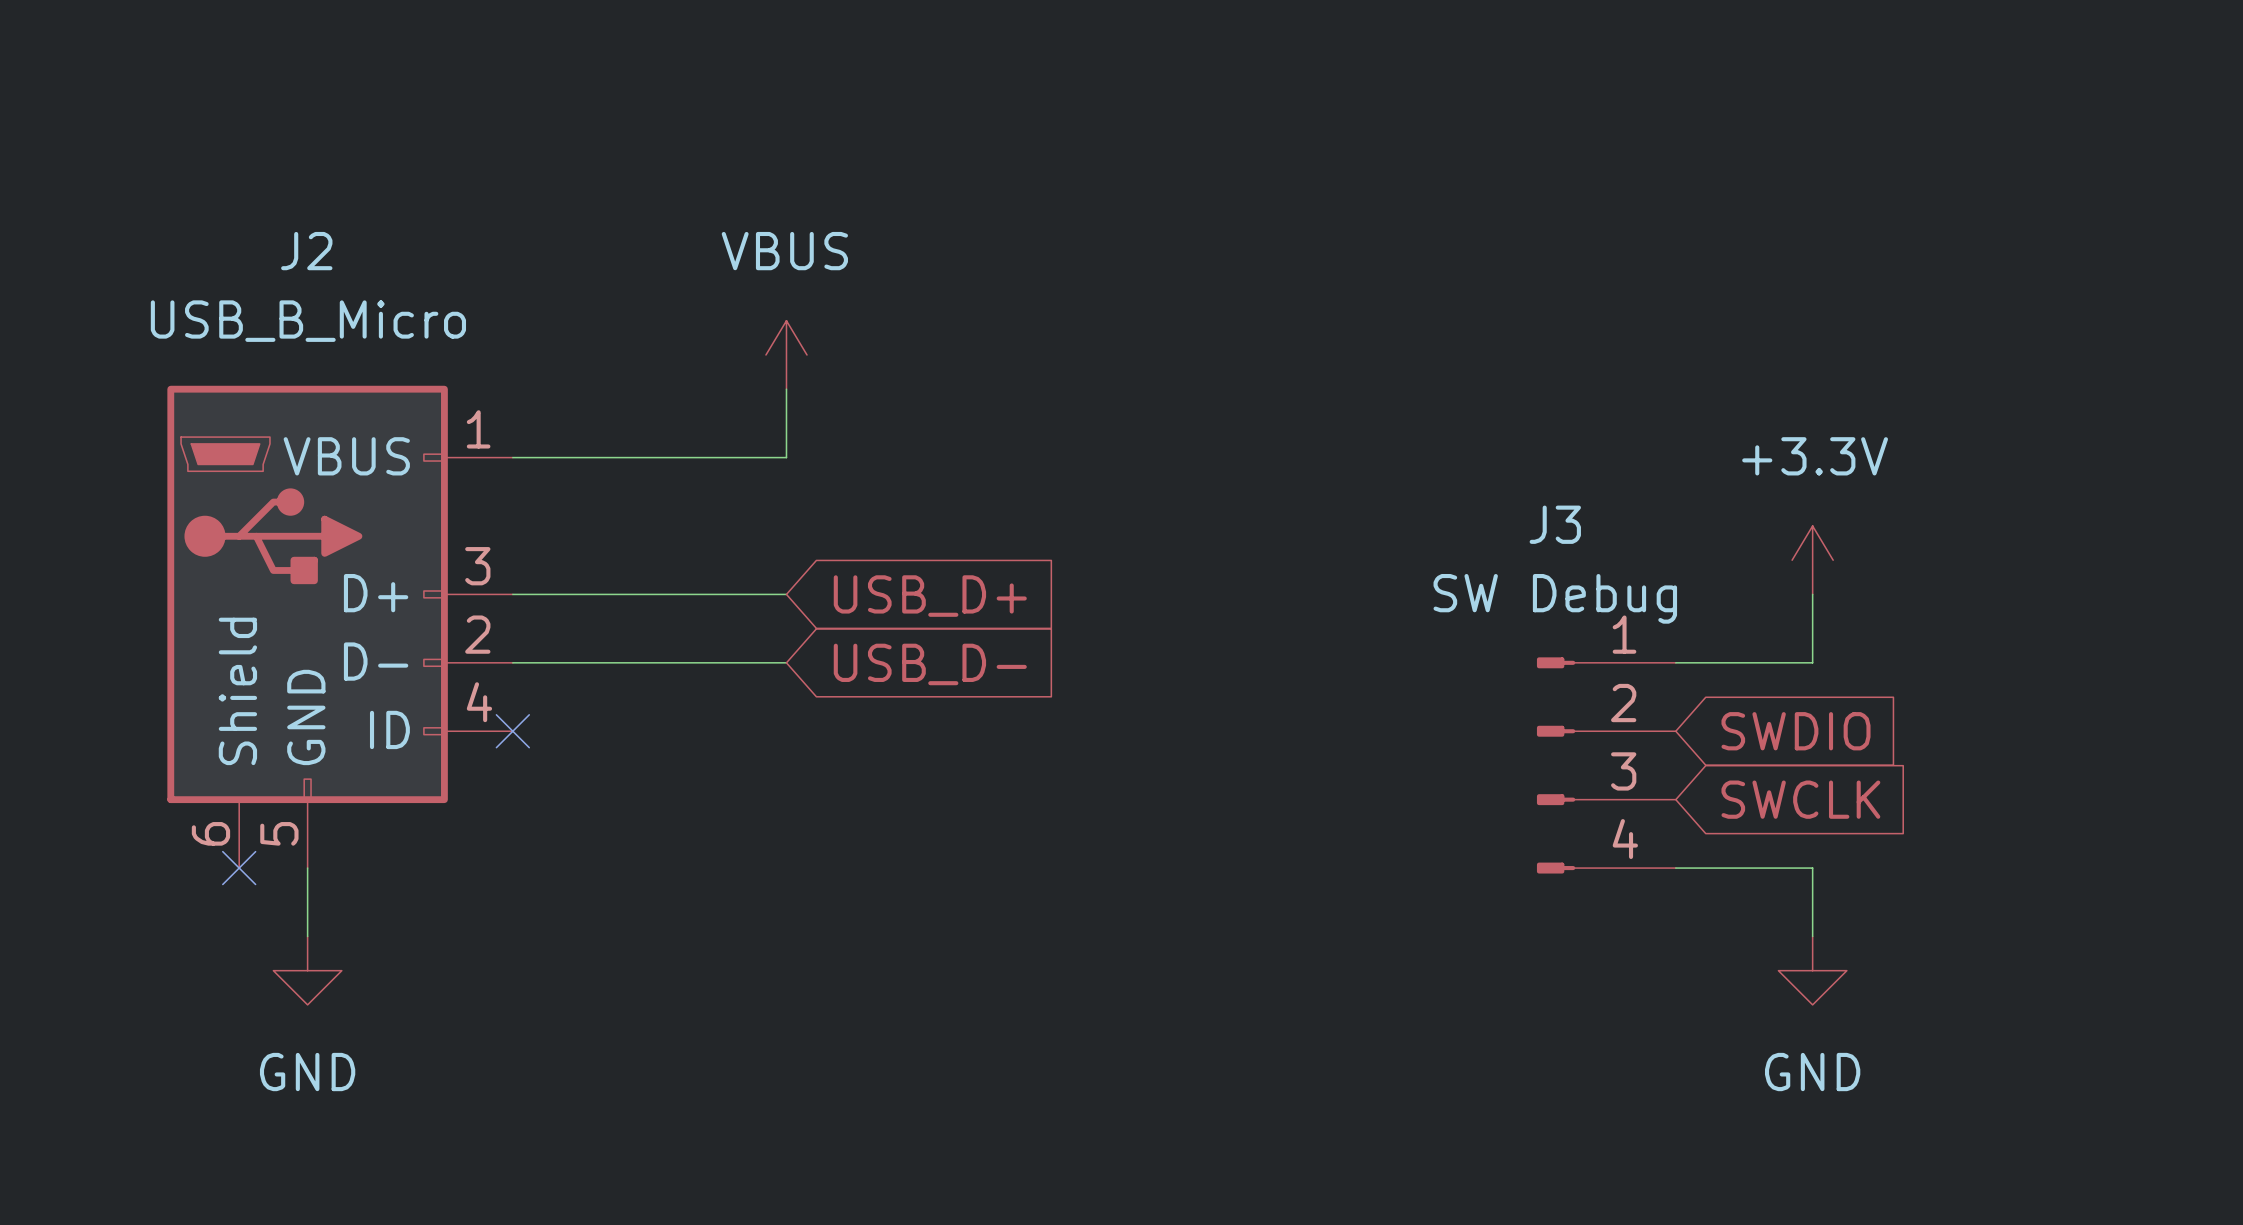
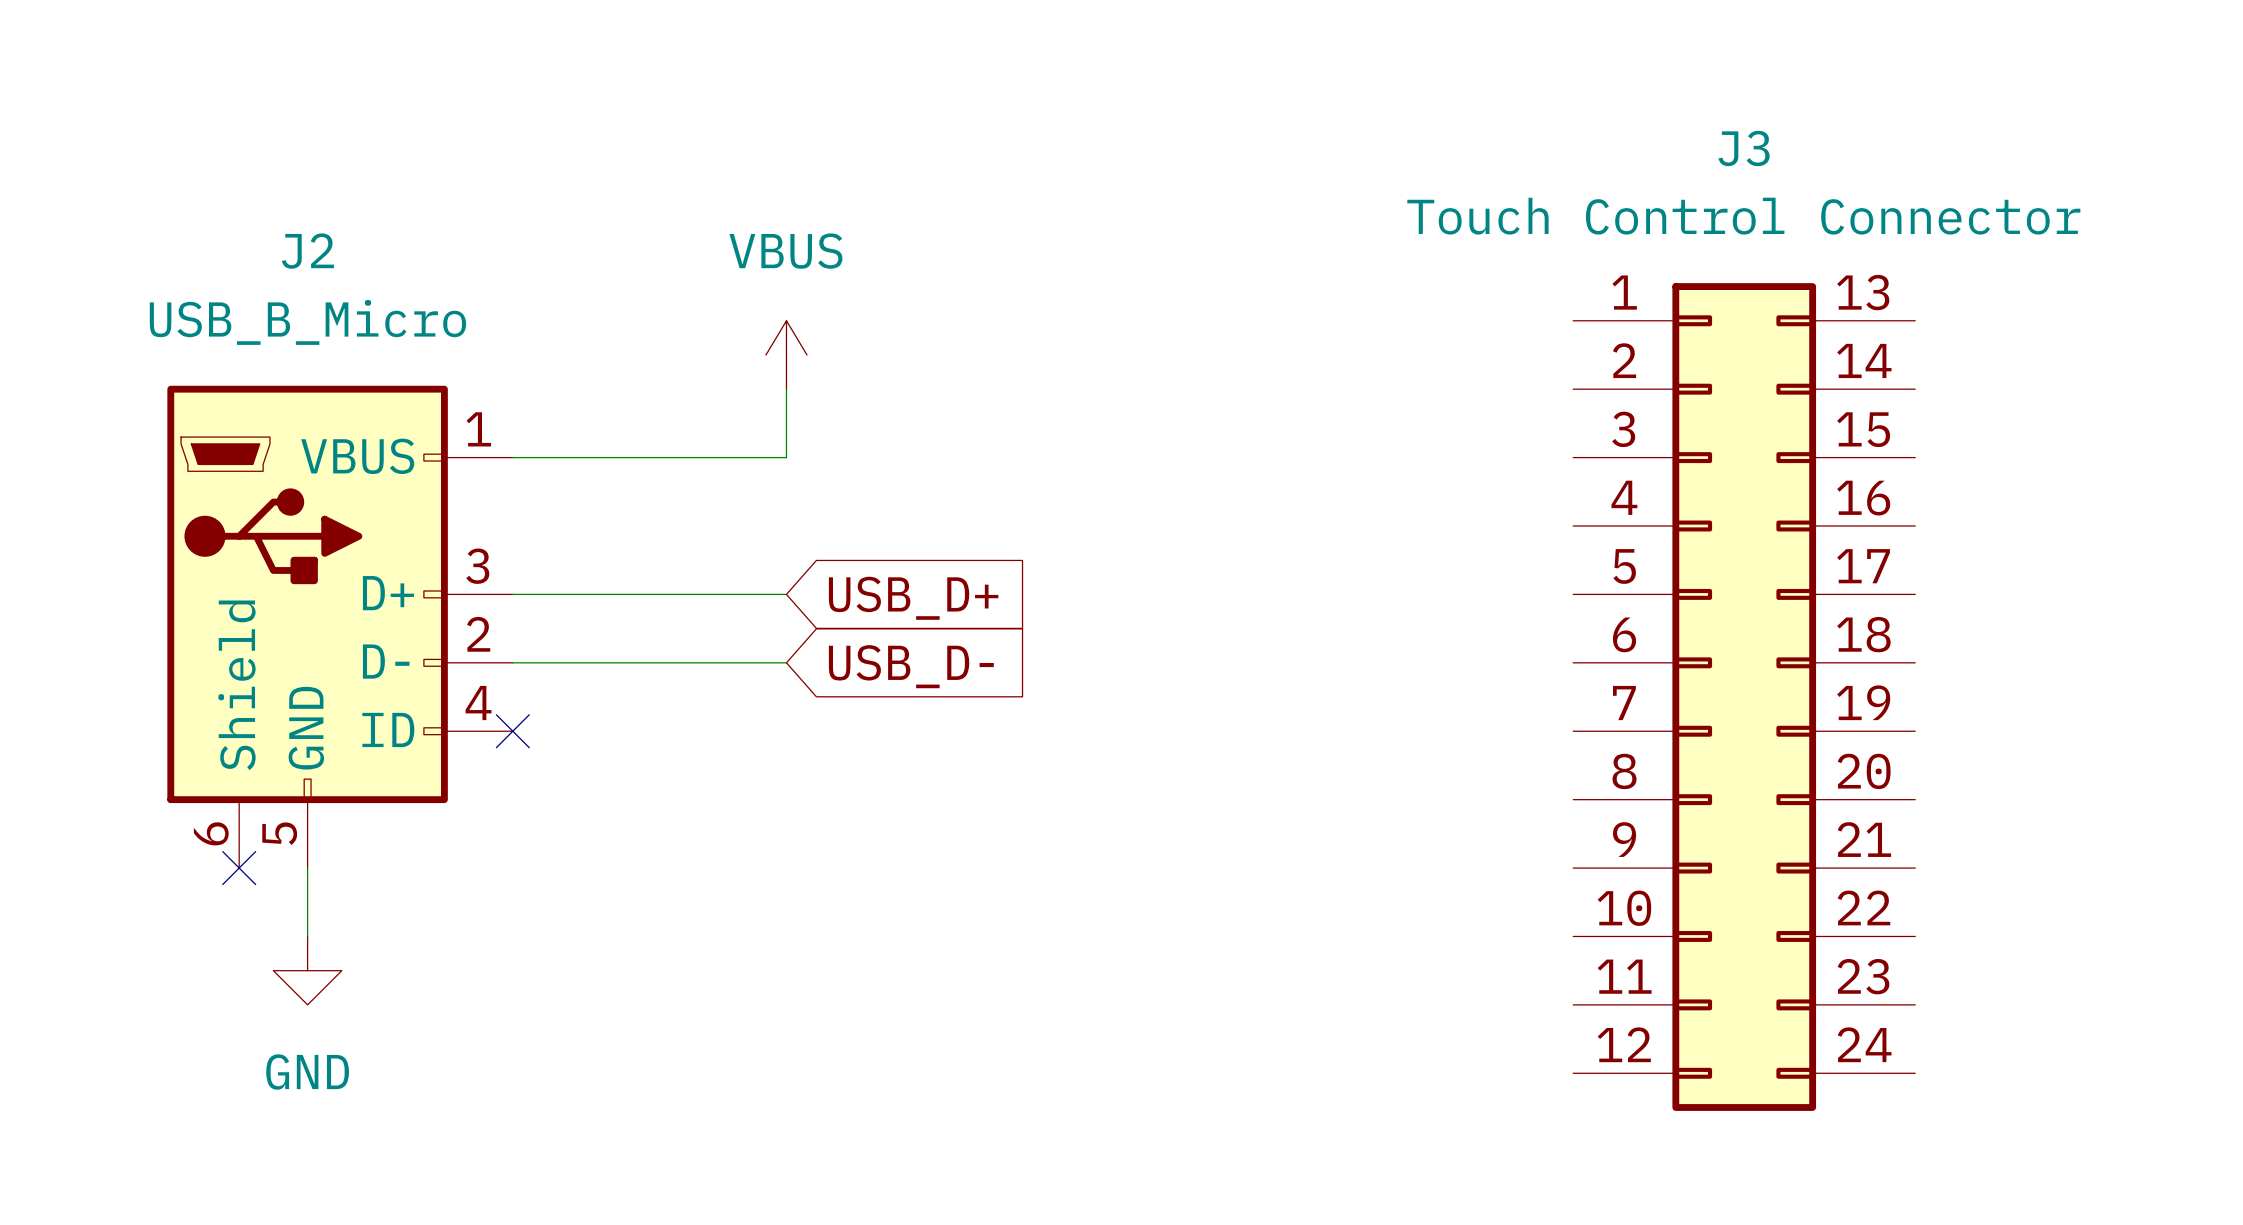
J3 name position: J3 (1555, 524) -> J3 (1744, 148)
power symbol: +3.3V (1812, 560) -> none
J3 value: SW Debug (1555, 598) -> Touch Control Connector (1743, 216)
J3 symbol: [1536, 657, 1676, 874] -> [1573, 283, 1916, 1111]
global label: SWDIO (1796, 731) -> none
global label: SWCLK (1800, 799) -> none
power symbol: GND (1812, 970) -> none

